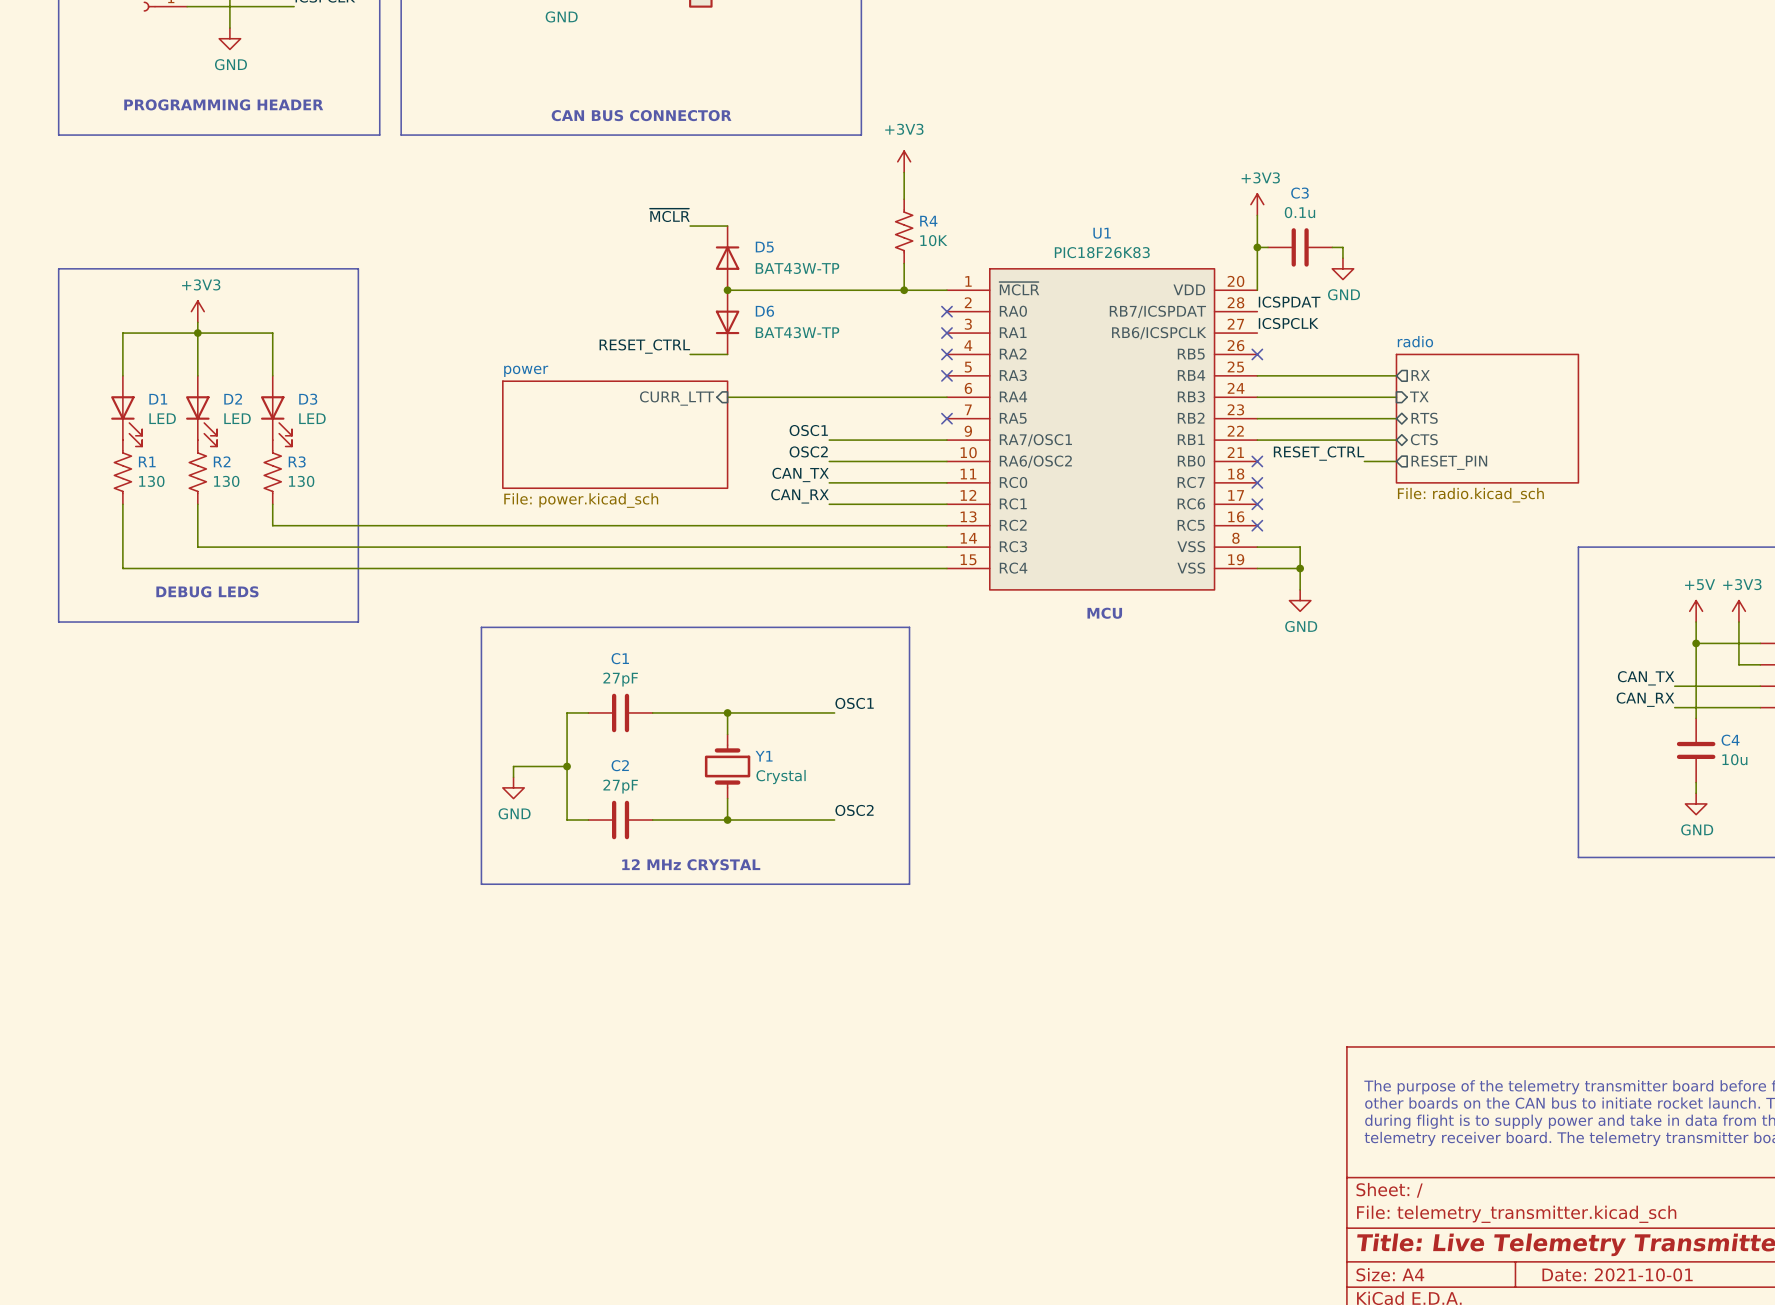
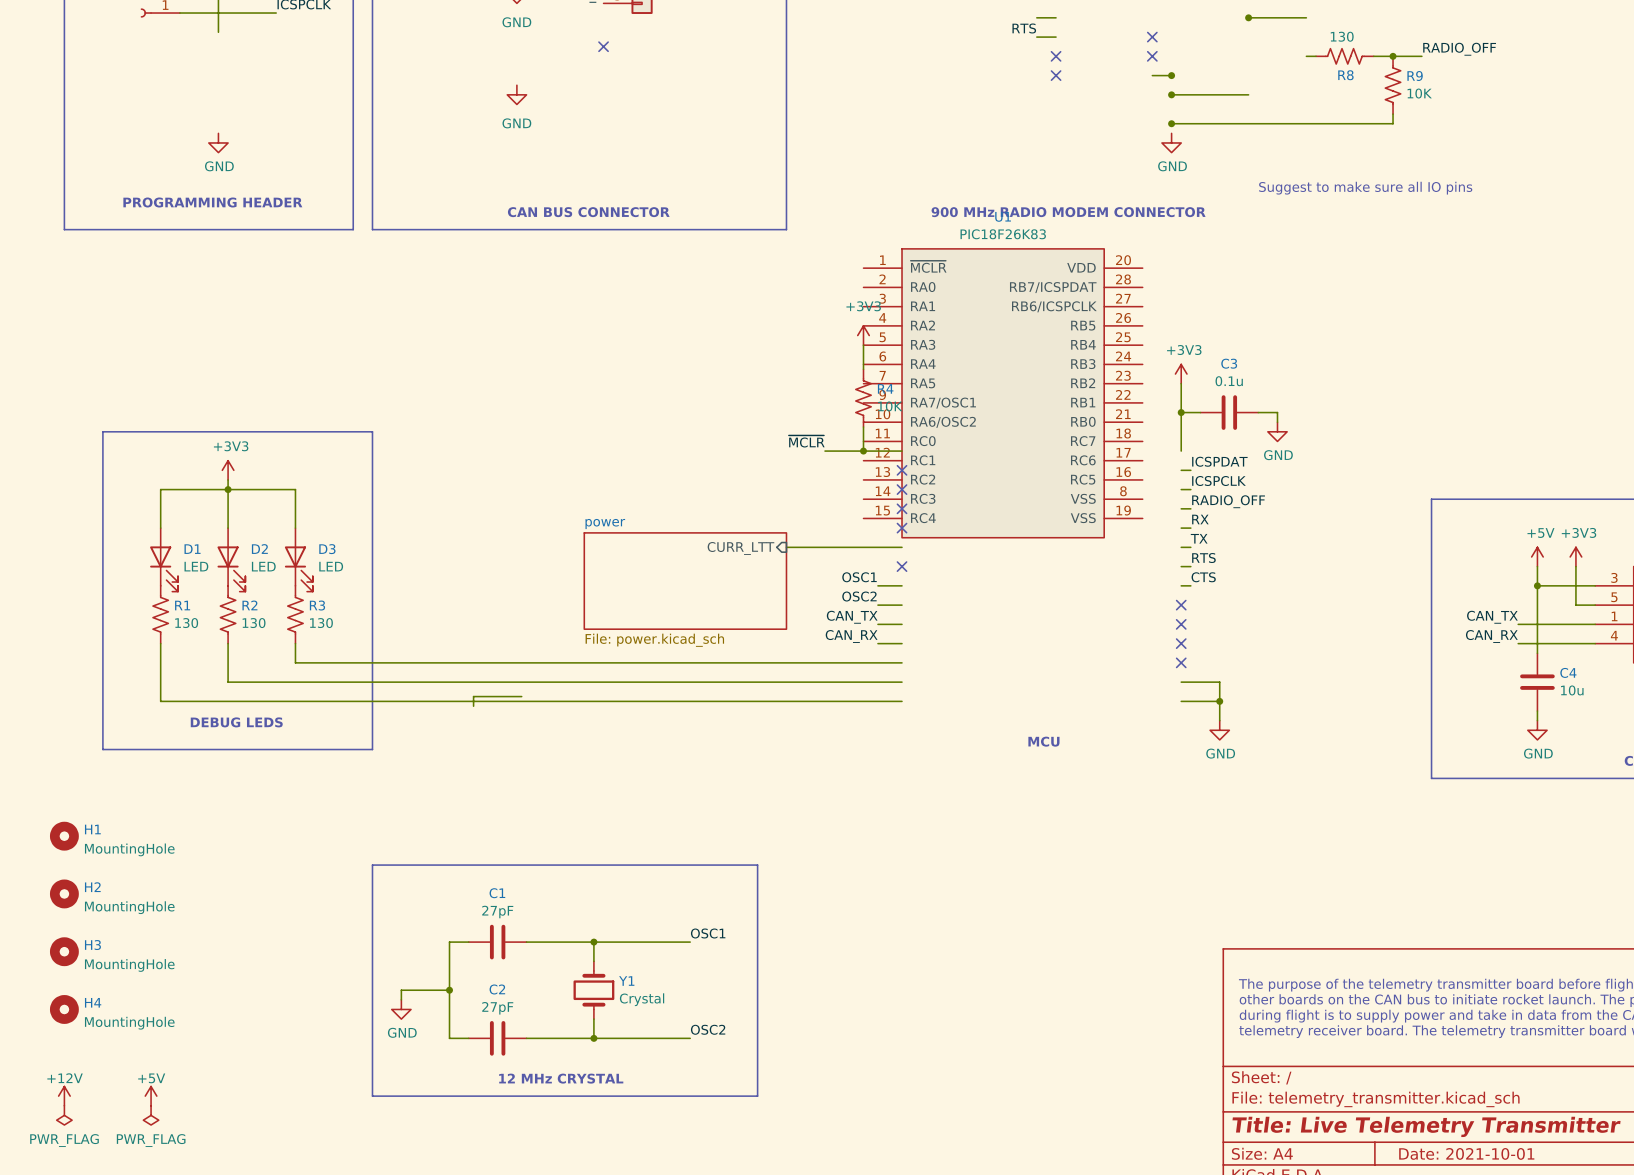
wire: none -> (1036, 17) (1056, 17)
wire: none -> (1248, 17) (1306, 17)
junction: none -> (1248, 17)
label: none -> RTS (1024, 28)
wire: none -> (1036, 37) (1056, 37)
no-connect mark: none -> (1152, 37)
power symbol position: GND (229, 38) -> GND (218, 142)
no-connect mark: none -> (603, 46)
label: none -> RADIO_OFF (1459, 49)
no-connect mark: none -> (1056, 56)
no-connect mark: none -> (1152, 56)
wire: none -> (1306, 56) (1316, 56)
R8: none -> 130 (1344, 56)
wire: none -> (1373, 56) (1421, 56)
junction: none -> (1393, 56)
no-connect mark: none -> (1056, 75)
wire: none -> (1152, 75) (1171, 75)
junction: none -> (1171, 75)
R9: none -> 10K (1393, 85)
power symbol: none -> GND (516, 94)
wire: none -> (1171, 94) (1248, 94)
junction: none -> (1171, 94)
text position: PROGRAMMING HEADER (223, 104) -> PROGRAMMING HEADER (212, 202)
text position: CAN BUS CONNECTOR (641, 115) -> CAN BUS CONNECTOR (588, 212)
wire: none -> (1393, 114) (1393, 123) (1171, 123)
junction: none -> (1171, 123)
line: (58, 135) (379, 135) -> (64, 128) (64, 229) (353, 229) (353, 128)
line: (401, 135) (861, 135) -> (372, 128) (372, 229) (786, 229) (786, 128)
power symbol: none -> GND (1171, 142)
power symbol: +3V3 (904, 161) -> none
wire: (904, 172) (904, 199) -> (863, 345) (863, 369)
text: none -> Suggest to make sure all IO pins (1365, 188)
power symbol: +3V3 (1257, 204) -> none
label: ~{MCLR} (669, 215) -> none
wire: (1257, 215) (1257, 290) -> (1181, 383) (1181, 451)
wire: (690, 226) (727, 226) -> none
text: none -> 900 MHz RADIO MODEM CONNECTOR (1068, 212)
R4 position: (904, 231) -> (863, 398)
wire: (1257, 247) (1268, 247) -> none
junction: (1257, 247) -> none
C3 position: (1300, 247) -> (1229, 412)
wire: (1332, 247) (1342, 247) (1342, 258) -> none
D5: BAT43W-TP (727, 258) -> none
wire: (904, 263) (904, 290) -> (863, 427) (863, 451)
line: (58, 268) (358, 268) (358, 622) (58, 622) (58, 268) -> (102, 431) (372, 431) (372, 749) (102, 749) (102, 431)
power symbol: GND (1342, 268) -> none
wire: (727, 290) (946, 290) -> none
junction: (727, 290) -> none
junction: (904, 290) -> none
label position: ICSPDAT (1289, 302) -> ICSPDAT (1219, 461)
power symbol position: +3V3 (197, 311) -> +3V3 (228, 470)
no-connect mark: (946, 311) -> none
wire: (197, 322) (197, 375) -> (228, 479) (228, 528)
D6: BAT43W-TP (727, 322) -> none
label position: ICSPCLK (1288, 323) -> ICSPCLK (1218, 481)
junction: (197, 333) -> none
no-connect mark: (946, 333) -> none
label: RESET_CTRL (644, 346) -> none
wire: (690, 354) (727, 354) -> none
no-connect mark: (946, 354) -> none
no-connect mark: (1257, 354) -> none
power symbol: none -> +3V3 (863, 335)
wire: (122, 375) (122, 333) (272, 333) (272, 375) -> (160, 528) (160, 489) (295, 489) (295, 528)
no-connect mark: (946, 375) -> none
wire: (1257, 375) (1396, 375) -> none
sheet pin: RX (1420, 375) -> none
sheet pin: TX (1419, 396) -> none
wire: (727, 397) (946, 397) -> none
wire: (1257, 397) (1396, 397) -> none
sheet pin: CURR_LTT (677, 398) -> none
power symbol: none -> +3V3 (1181, 374)
D1 position: (126, 411) -> (164, 559)
D2 position: (201, 411) -> (231, 559)
D3 position: (276, 411) -> (298, 559)
no-connect mark: (946, 418) -> none
wire: (1257, 418) (1396, 418) -> none
sheet pin: RTS (1424, 418) -> none
sheet radio: File: radio.kicad_sch (1487, 418) -> none
label: OSC1 (808, 430) -> none
sheet power: File: power.kicad_sch (615, 434) -> none
sheet pin: CTS (1424, 439) -> none
wire: (829, 440) (946, 440) -> none
wire: (1257, 440) (1396, 440) -> none
wire: none -> (1181, 412) (1200, 412)
junction: none -> (1181, 412)
wire: none -> (1258, 412) (1277, 412) (1277, 422)
label: OSC2 (808, 451) -> none
label: RESET_CTRL (1319, 453) -> none
wire: (829, 461) (946, 461) -> none
no-connect mark: (1257, 461) -> none
wire: (1364, 461) (1396, 461) -> none
sheet pin: RESET_PIN (1449, 462) -> none
R1 position: (122, 472) -> (160, 614)
R2 position: (197, 472) -> (228, 614)
R3 position: (272, 472) -> (295, 614)
power symbol: none -> GND (1277, 431)
label: CAN_TX (800, 474) -> none
wire: (829, 482) (946, 482) -> none
label: none -> ~{MCLR} (806, 441)
no-connect mark: (1257, 482) -> none
wire: none -> (824, 451) (902, 451)
junction: none -> (863, 451)
label: CAN_RX (800, 496) -> none
wire: (122, 504) (122, 568) (946, 568) -> (160, 643) (160, 701) (902, 701)
wire: (197, 504) (197, 547) (946, 547) -> (228, 643) (228, 682) (902, 682)
wire: (272, 504) (272, 525) (946, 525) -> (295, 643) (295, 662) (902, 662)
wire: (829, 504) (946, 504) -> none
no-connect mark: (1257, 504) -> none
no-connect mark: none -> (902, 470)
wire: none -> (1181, 470) (1190, 470)
no-connect mark: (1257, 525) -> none
junction: none -> (228, 489)
no-connect mark: none -> (902, 489)
wire: none -> (1181, 489) (1190, 489)
wire: (1257, 547) (1300, 547) (1300, 589) -> (1181, 682) (1219, 682) (1219, 720)
label: none -> RADIO_OFF (1228, 501)
no-connect mark: none -> (902, 508)
wire: none -> (1181, 508) (1190, 508)
wire: (1257, 568) (1300, 568) -> (1181, 701) (1219, 701)
junction: (1300, 568) -> none
label: none -> RX (1200, 519)
no-connect mark: none -> (902, 528)
wire: none -> (1181, 528) (1190, 528)
text position: DEBUG LEDS (207, 591) -> DEBUG LEDS (236, 722)
label: none -> TX (1199, 538)
wire: none -> (786, 547) (902, 547)
power symbol: GND (1300, 600) -> none
sheet pin: none -> CURR_LTT (740, 548)
label: none -> RTS (1203, 558)
text position: MCU (1104, 613) -> MCU (1043, 741)
no-connect mark: none -> (902, 566)
wire: none -> (1181, 566) (1190, 566)
line: (481, 627) (481, 884) (909, 884) (909, 627) (481, 627) -> none
label: none -> OSC1 (859, 577)
label: none -> CTS (1203, 577)
sheet power: none -> File: power.kicad_sch (685, 581)
wire: none -> (877, 585) (902, 585)
wire: none -> (1181, 585) (1190, 585)
label: none -> OSC2 (859, 596)
wire: none -> (877, 605) (902, 605)
no-connect mark: none -> (1181, 605)
label: none -> CAN_TX (852, 617)
wire: none -> (877, 624) (902, 624)
no-connect mark: none -> (1181, 624)
label: none -> CAN_RX (851, 636)
label: OSC1 (854, 703) -> none
wire: none -> (877, 643) (902, 643)
no-connect mark: none -> (1181, 643)
wire: (588, 712) (567, 712) (567, 820) (588, 820) -> none
C1 position: (620, 712) -> (497, 942)
wire: (652, 712) (834, 712) -> none
wire: (727, 712) (727, 734) -> none
junction: (727, 712) -> none
no-connect mark: none -> (1181, 662)
junction: (567, 766) -> none
Y1 position: (727, 766) -> (593, 990)
junction: none -> (1219, 701)
power symbol: GND (513, 787) -> none
wire: (727, 798) (727, 820) -> none
power symbol: none -> GND (1219, 730)
label: OSC2 (854, 810) -> none
C2 position: (620, 820) -> (497, 1038)
wire: (652, 820) (834, 820) -> none
junction: (727, 820) -> none
text: 12 MHz CRYSTAL (691, 864) -> none
H1: none -> MountingHole (64, 836)
line: none -> (372, 865) (372, 1096) (757, 1096) (757, 865) (372, 865)
H2: none -> MountingHole (64, 893)
label: none -> OSC1 (708, 933)
wire: none -> (468, 942) (449, 942) (449, 1038) (468, 1038)
wire: none -> (526, 942) (690, 942)
wire: none -> (593, 942) (593, 961)
junction: none -> (593, 942)
H3: none -> MountingHole (64, 951)
wire: none -> (449, 990) (401, 990) (401, 999)
junction: none -> (449, 990)
H4: none -> MountingHole (64, 1009)
power symbol: none -> GND (401, 1009)
wire: none -> (593, 1019) (593, 1038)
label: none -> OSC2 (708, 1029)
wire: none -> (526, 1038) (690, 1038)
junction: none -> (593, 1038)
text: none -> 12 MHz CRYSTAL (561, 1078)
power symbol: none -> +12V (64, 1096)
power symbol: none -> +5V (151, 1096)
power symbol: none -> PWR_FLAG (64, 1115)
power symbol: none -> PWR_FLAG (151, 1115)

